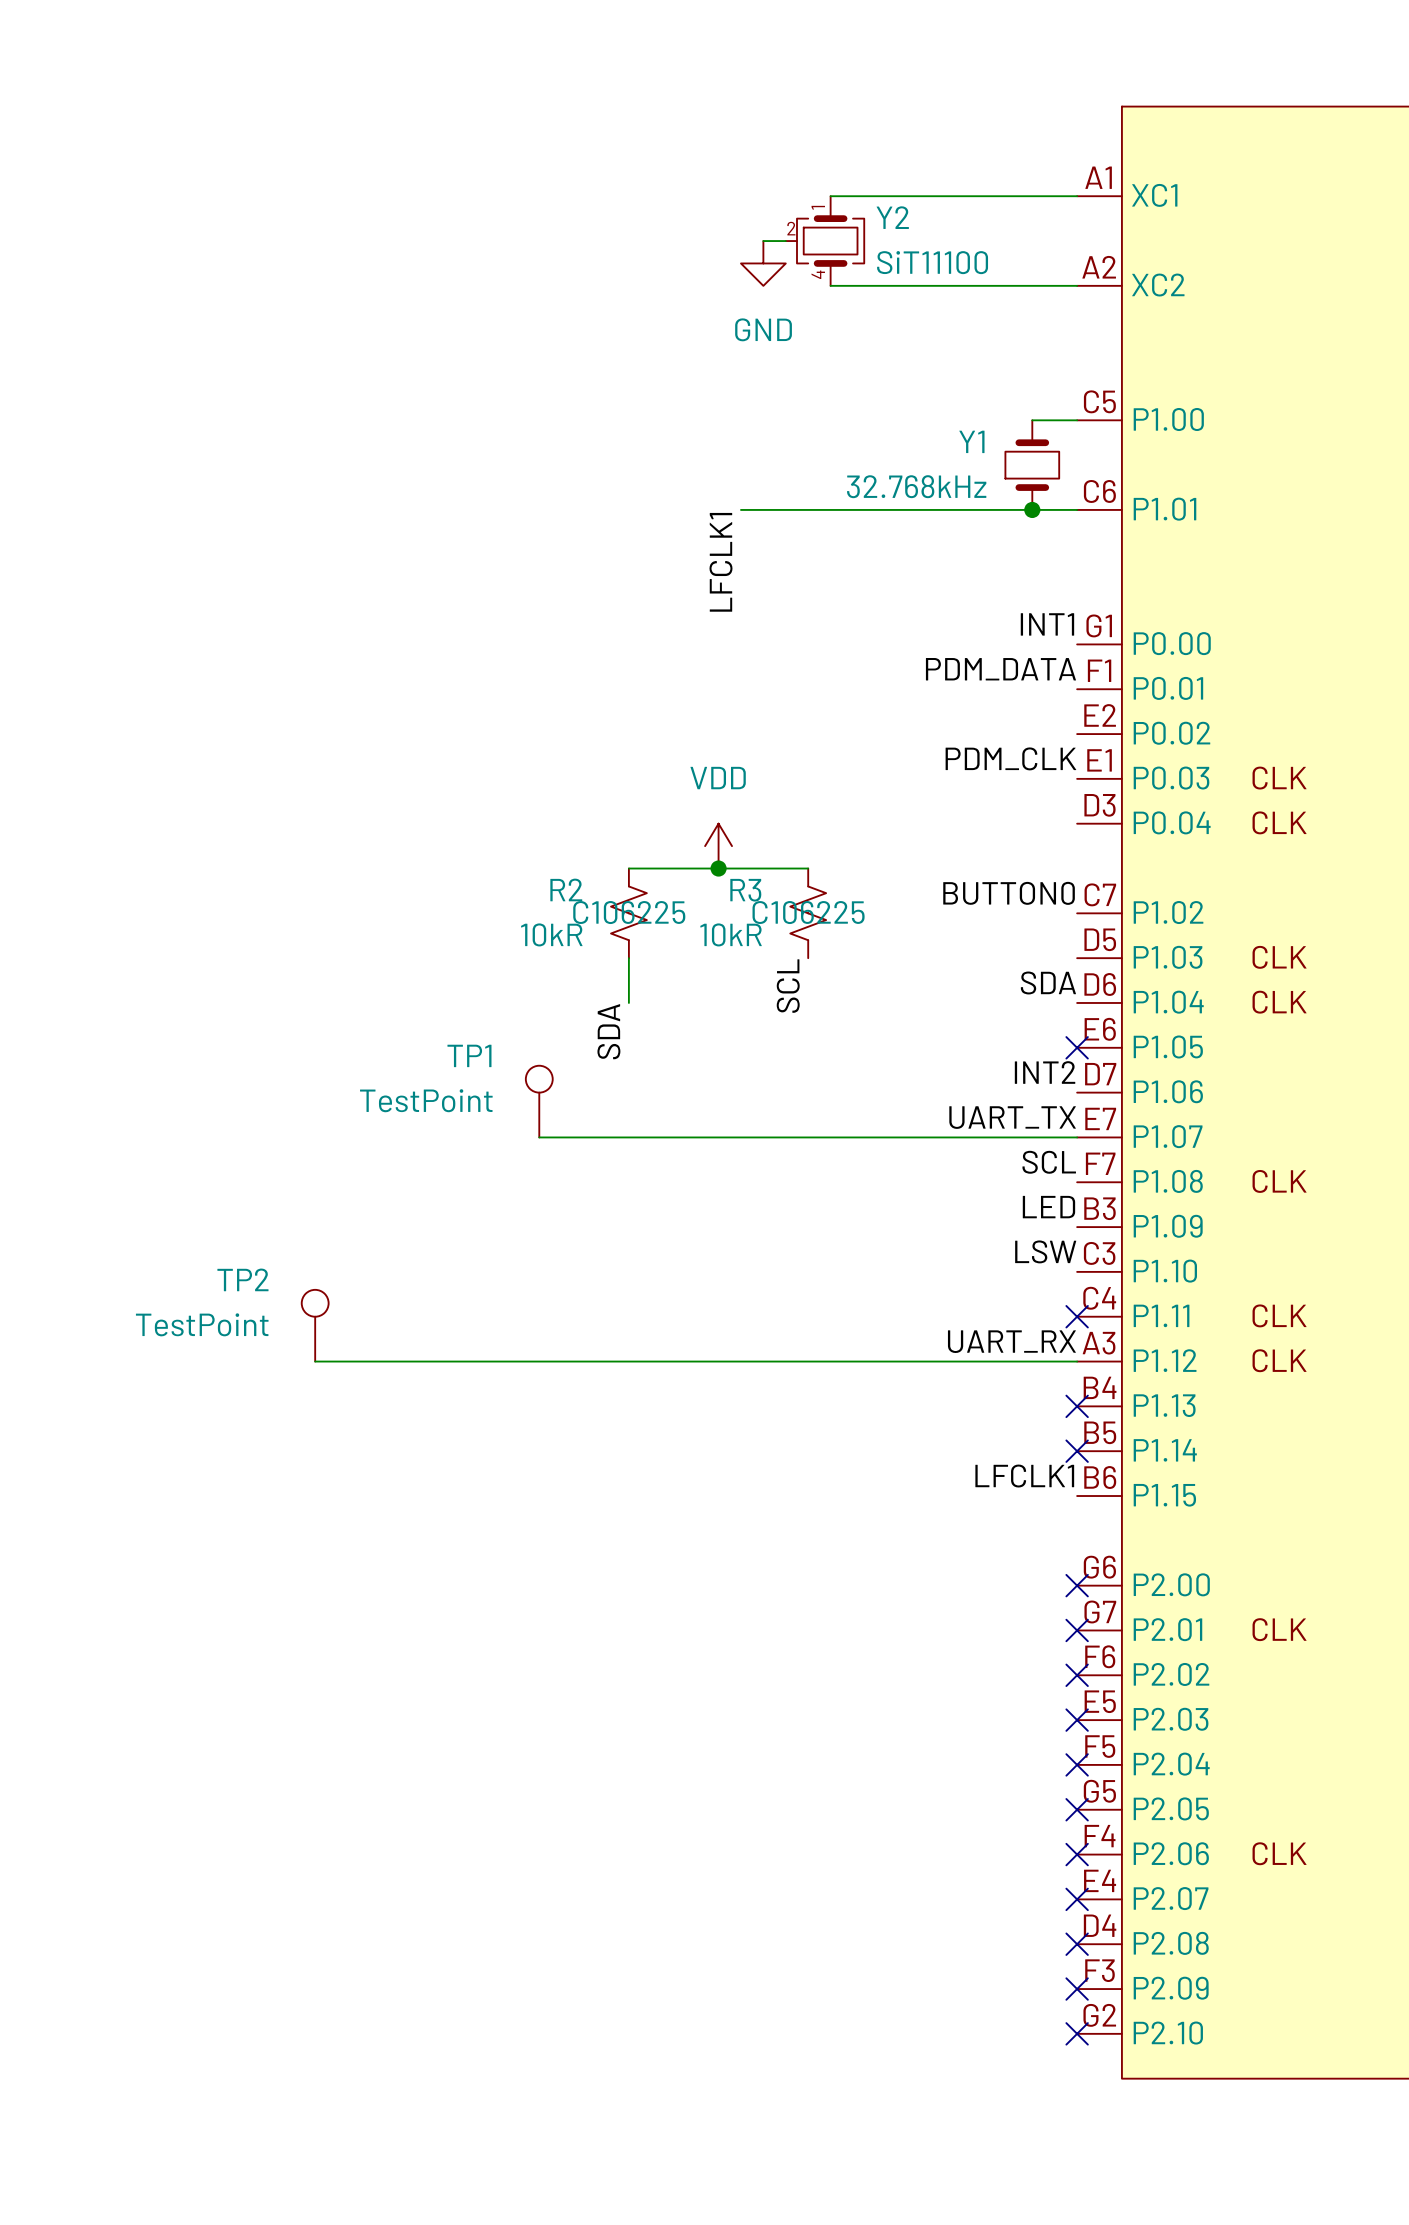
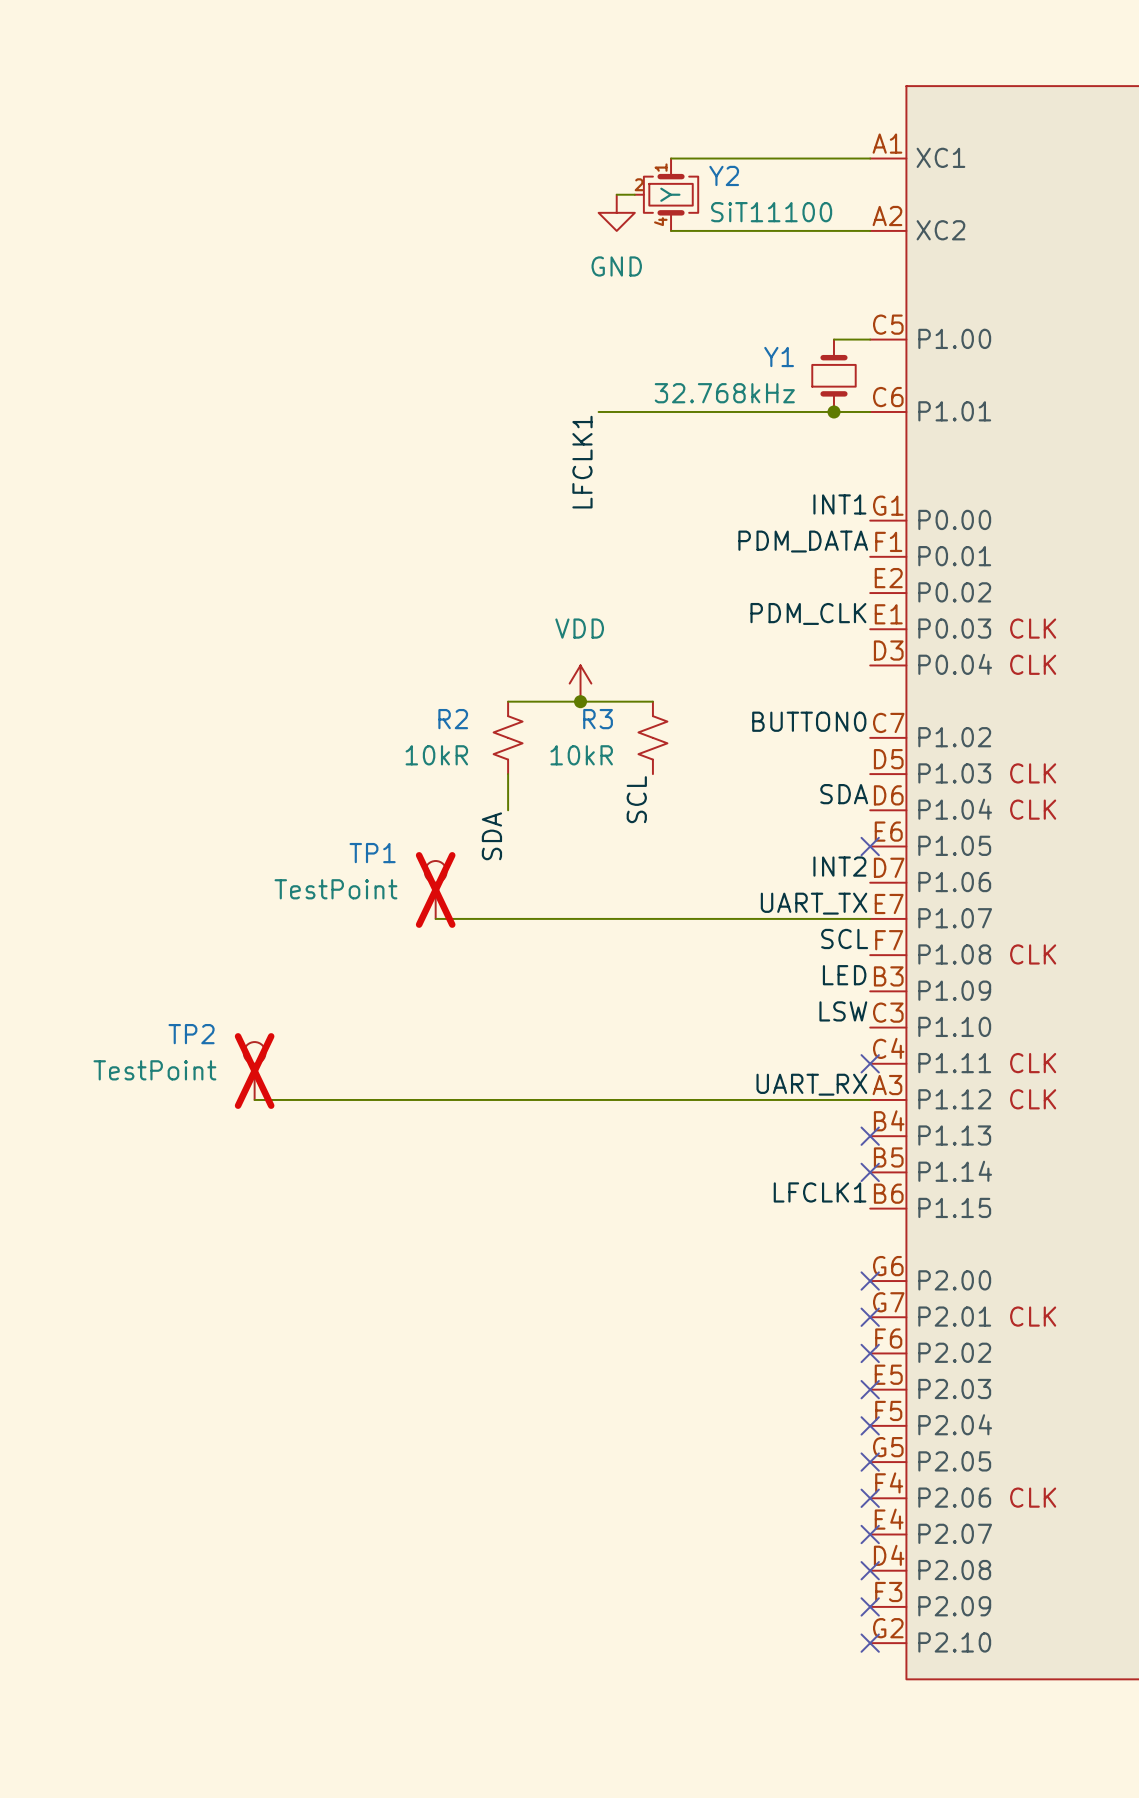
Y2 text: none -> Y (670, 194)
R2 text: C106225 (629, 912) -> none
R3 text: C106225 (808, 912) -> none
TP1 do-not-place cross: none -> (435, 889)
TP2 do-not-place cross: none -> (254, 1071)

